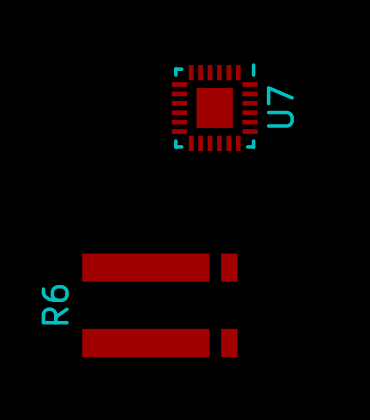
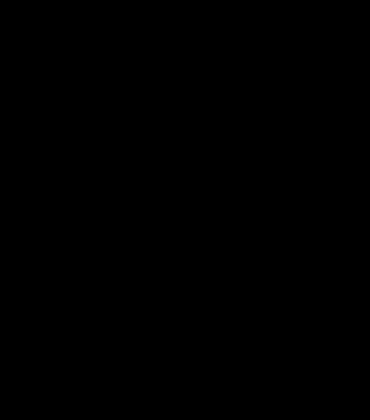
U7: (214, 107) -> none
R6: (159, 305) -> none

